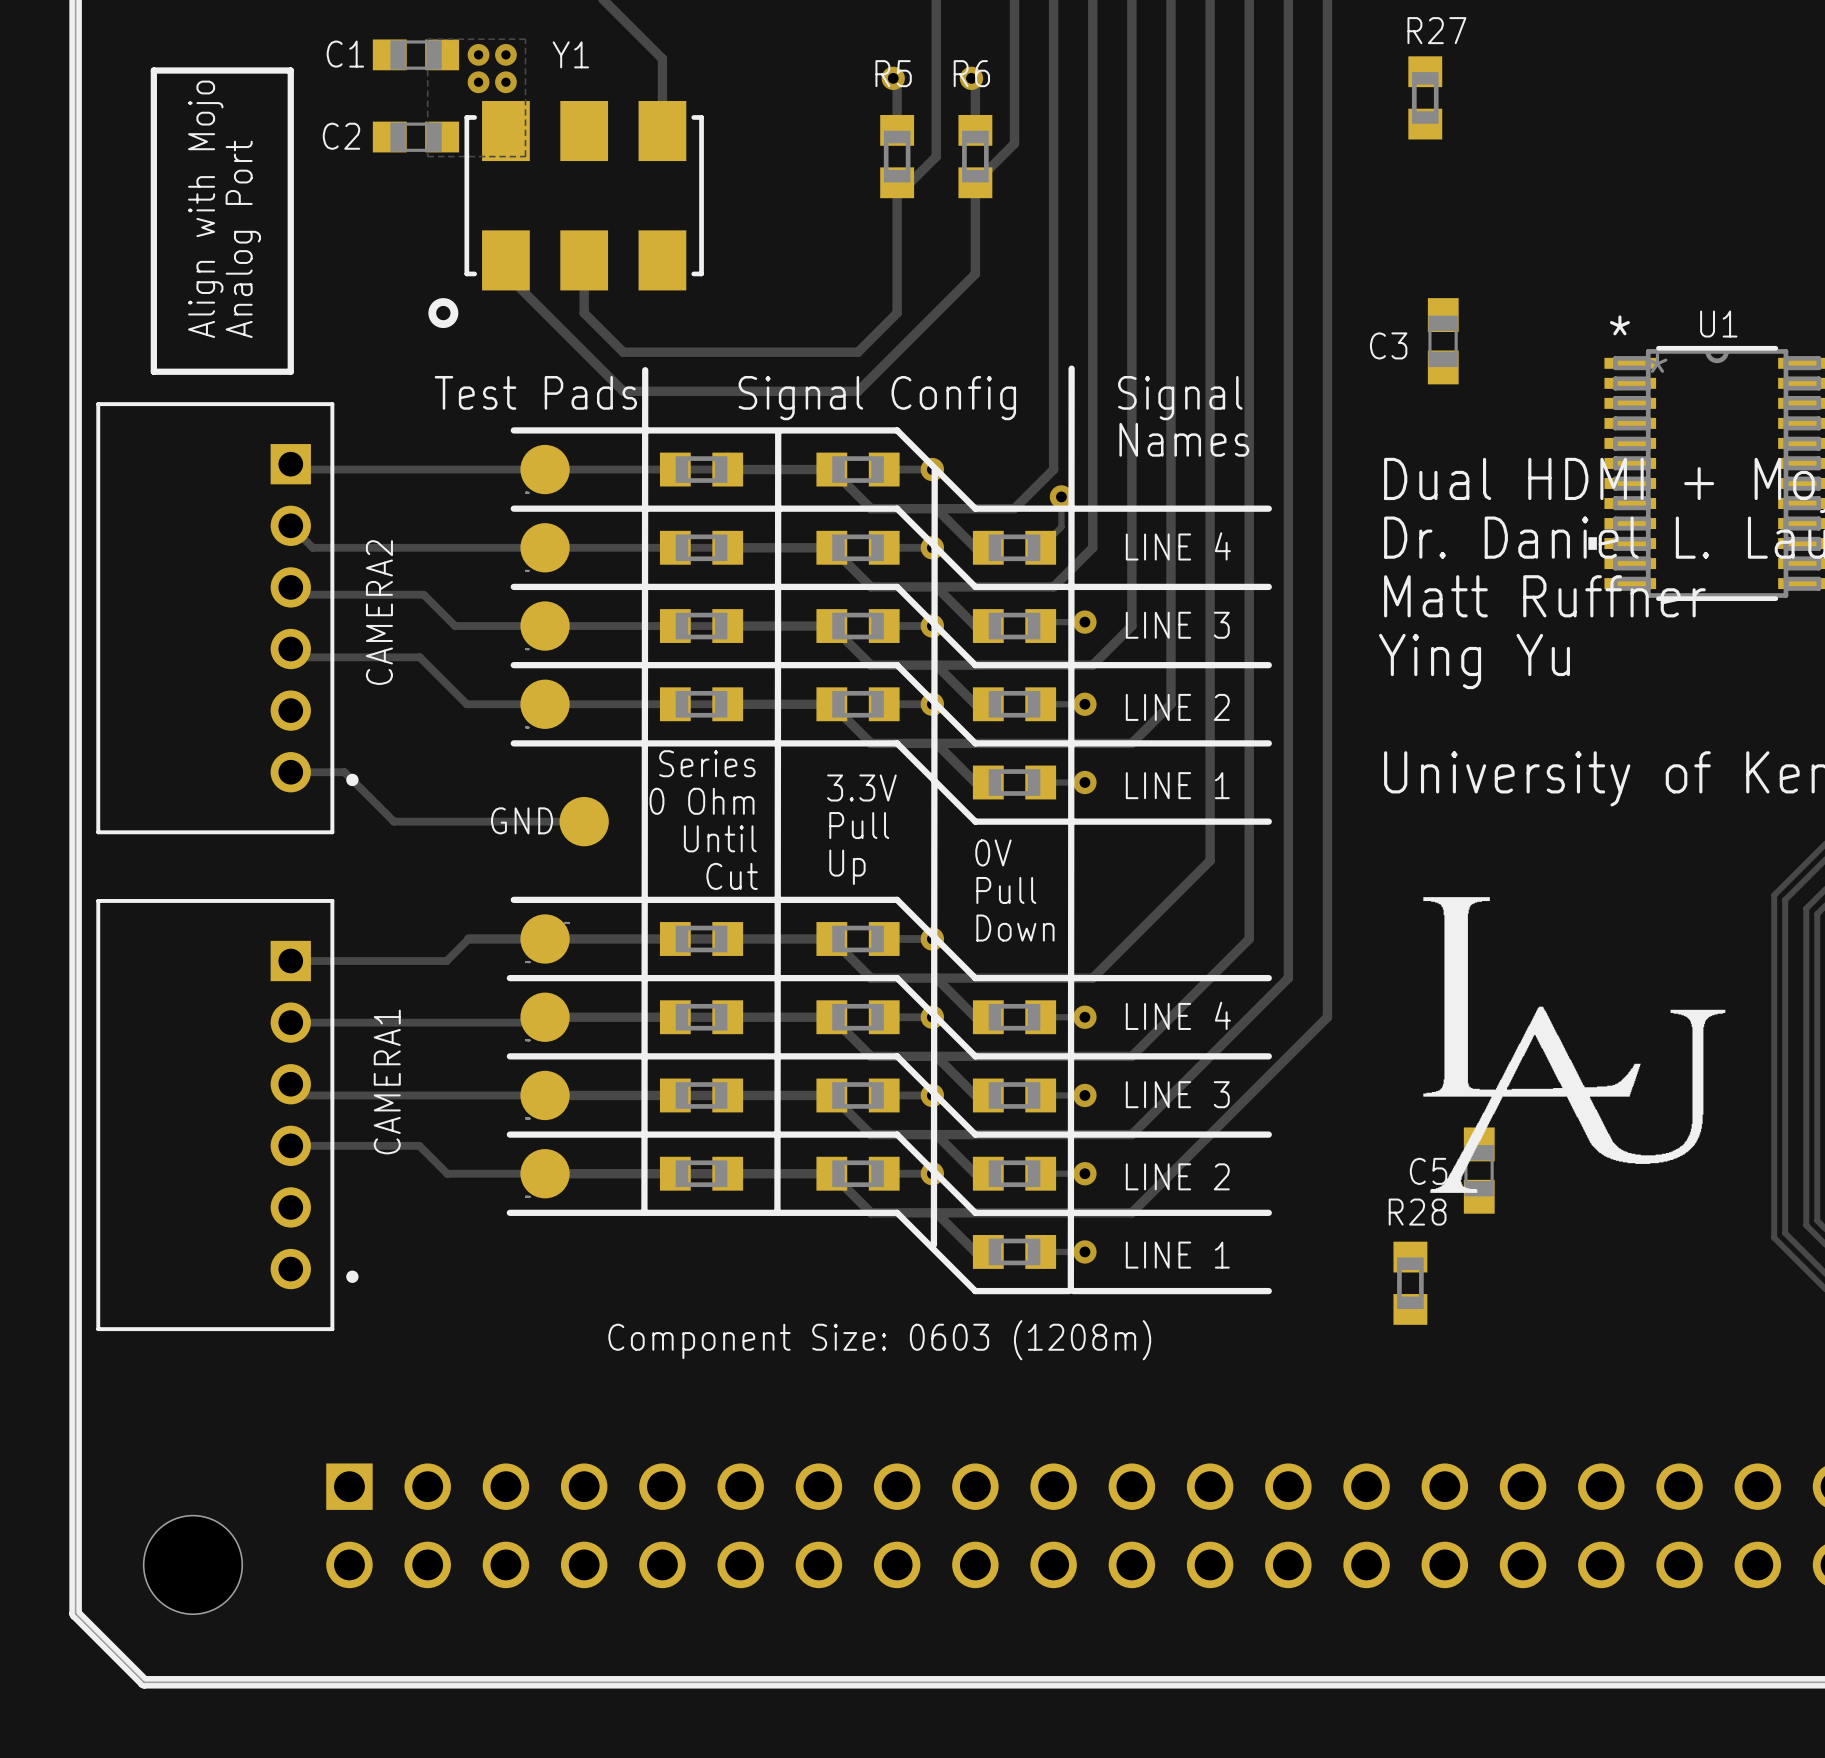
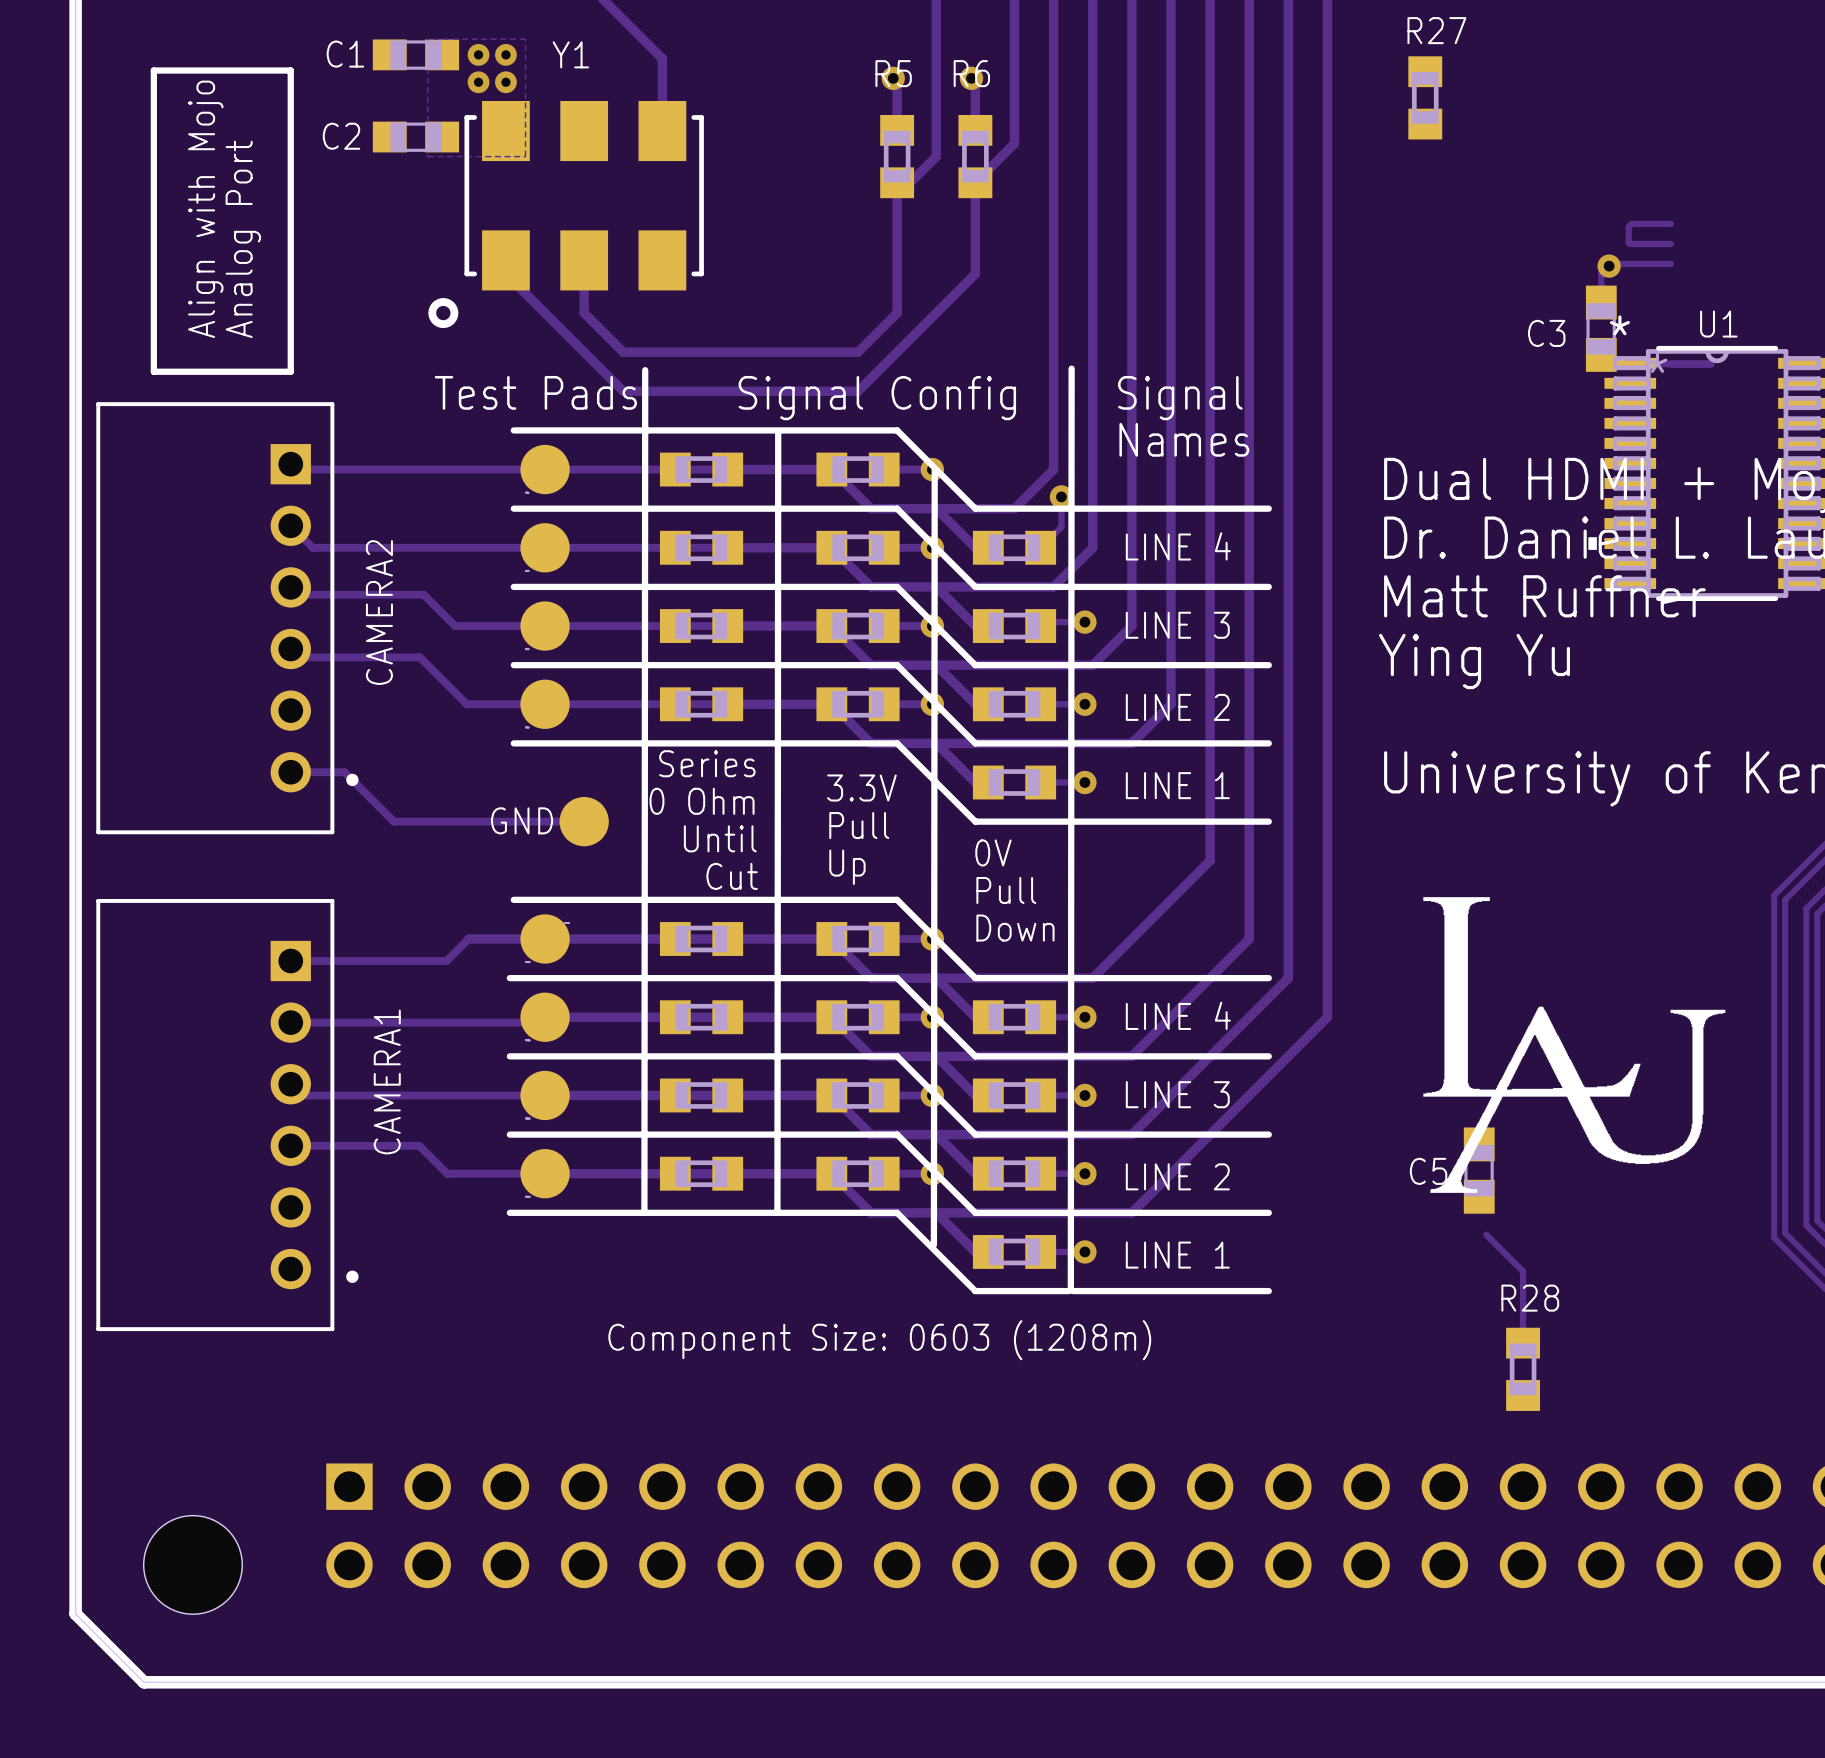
track: none -> (1670, 223) (1631, 223) (1628, 227) (1629, 243) (1670, 243)
track: none -> (1670, 263) (1611, 263) (1601, 273) (1601, 302)
via: none -> (1609, 266)
C3 position: (1443, 341) -> (1601, 328)
track: none -> (1601, 354) (1610, 364) (1710, 364)
track: none -> (1486, 1234) (1523, 1271) (1523, 1343)
R28 position: (1410, 1283) -> (1523, 1369)

